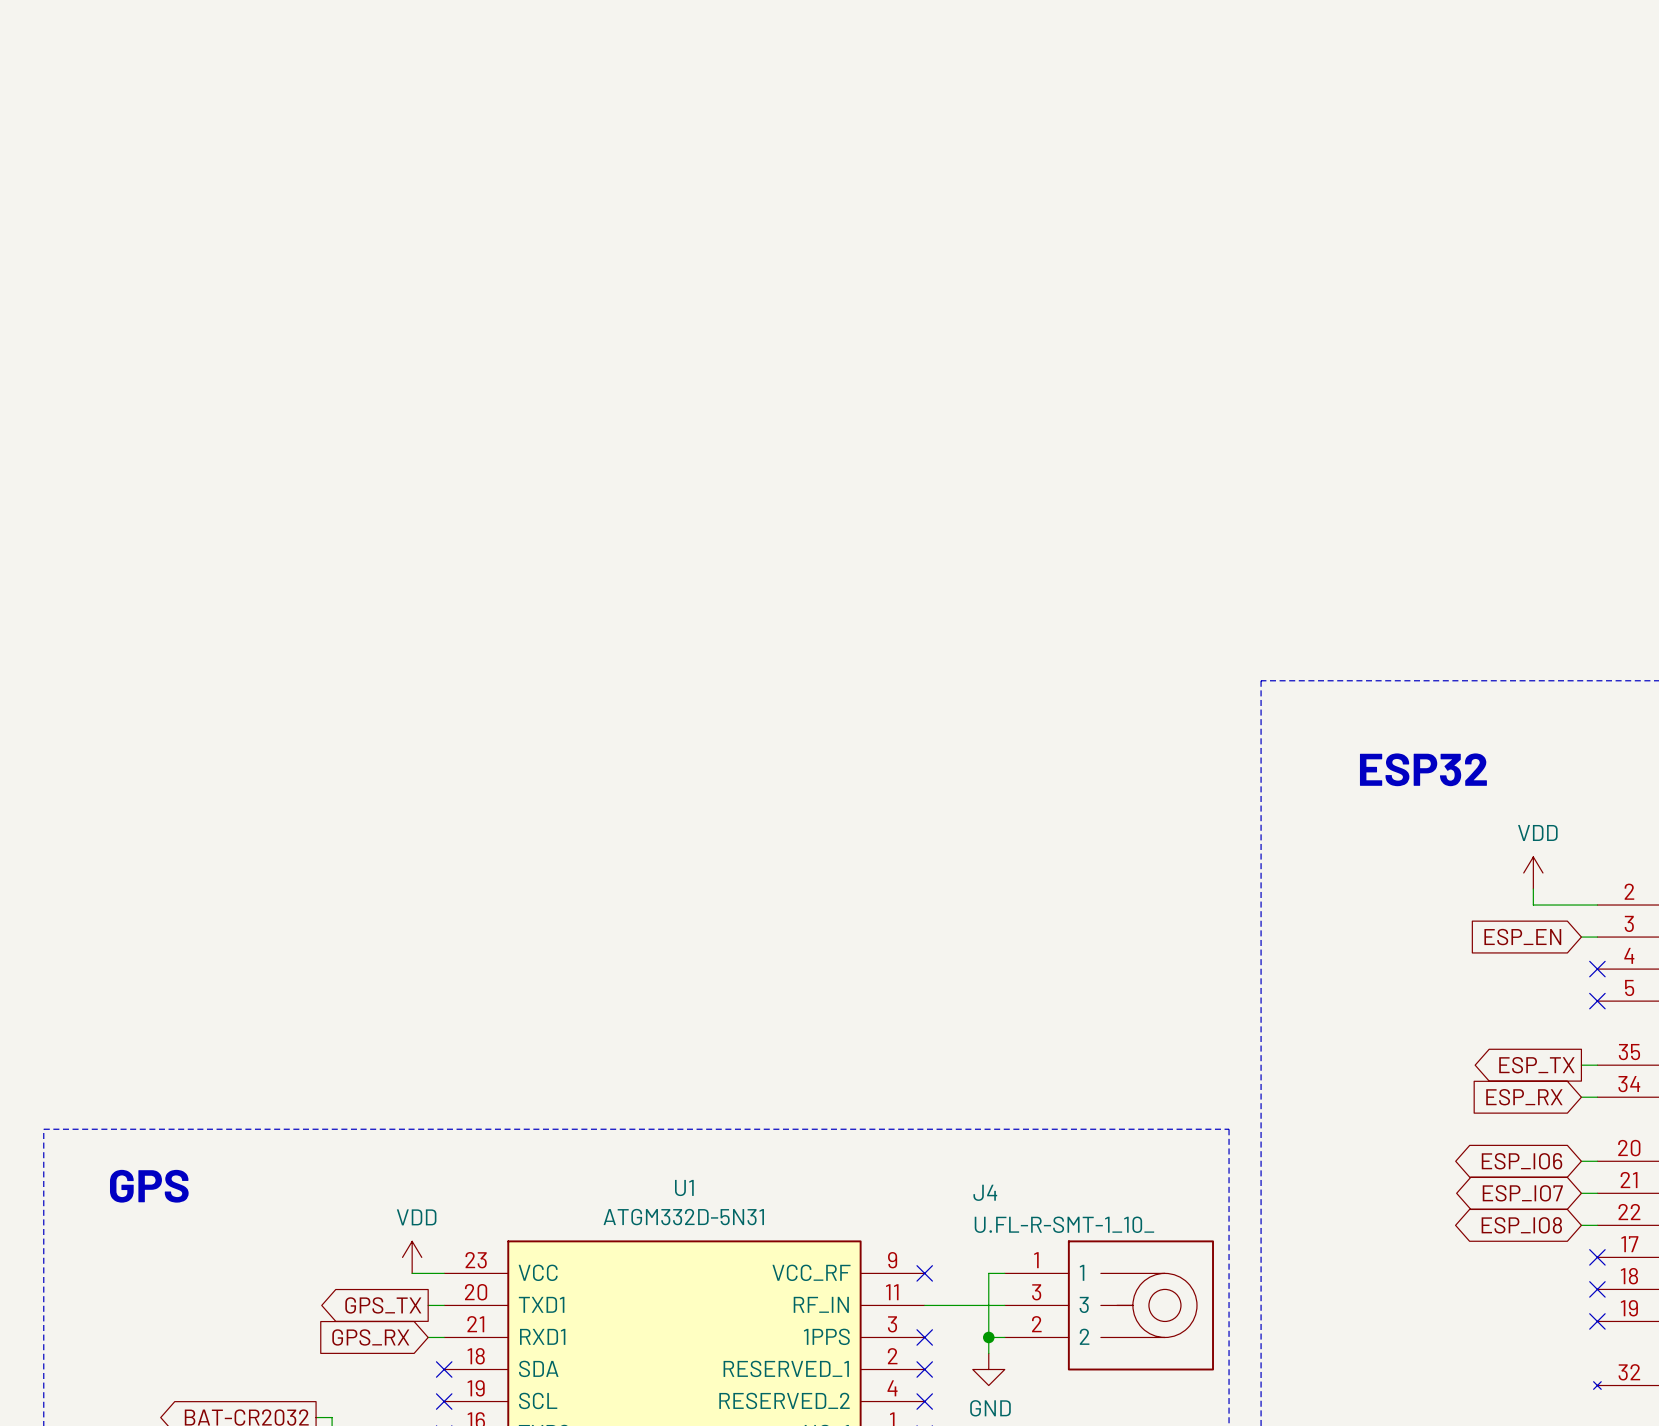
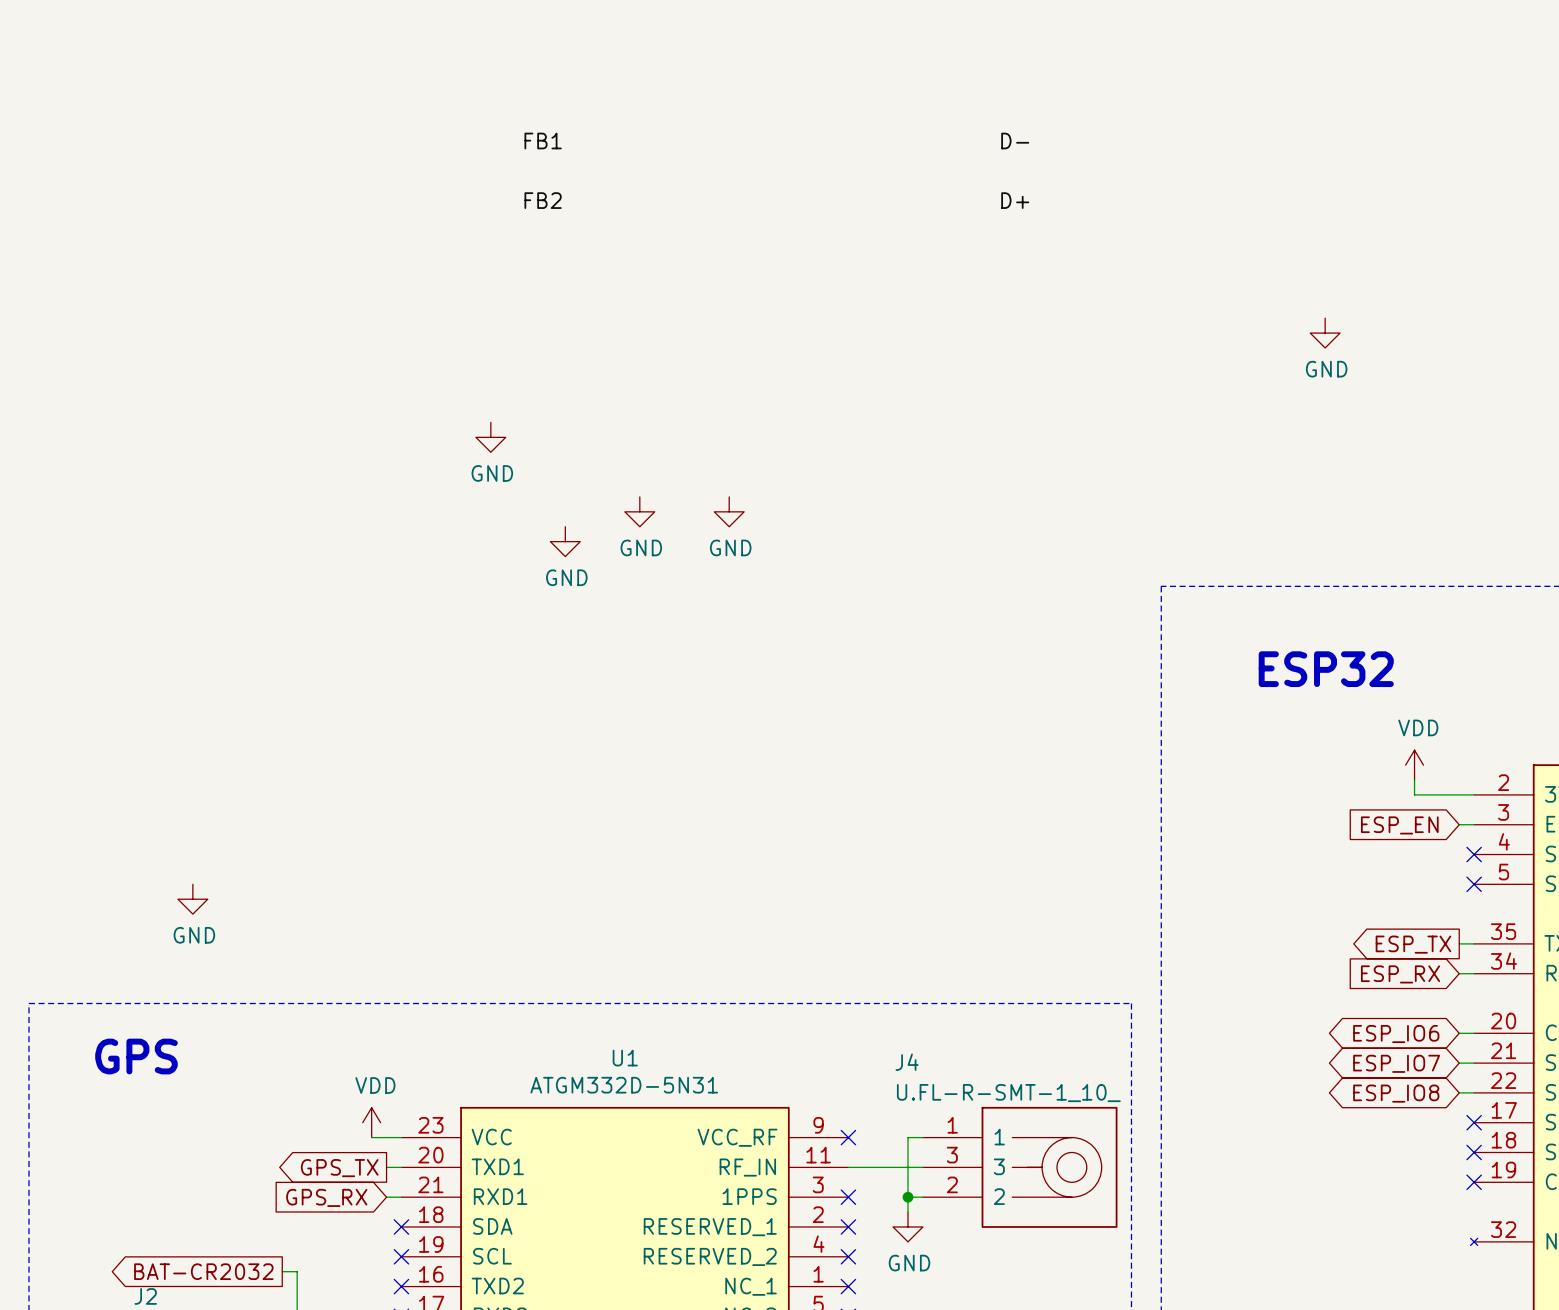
label: none -> FB1 (543, 141)
label: none -> D- (1015, 141)
label: none -> FB2 (543, 200)
label: none -> D+ (1015, 200)
power symbol: none -> GND (1325, 333)
power symbol: none -> GND (490, 437)
power symbol: none -> GND (639, 511)
power symbol: none -> GND (729, 511)
power symbol: none -> GND (565, 541)
power symbol: none -> GND (192, 899)

